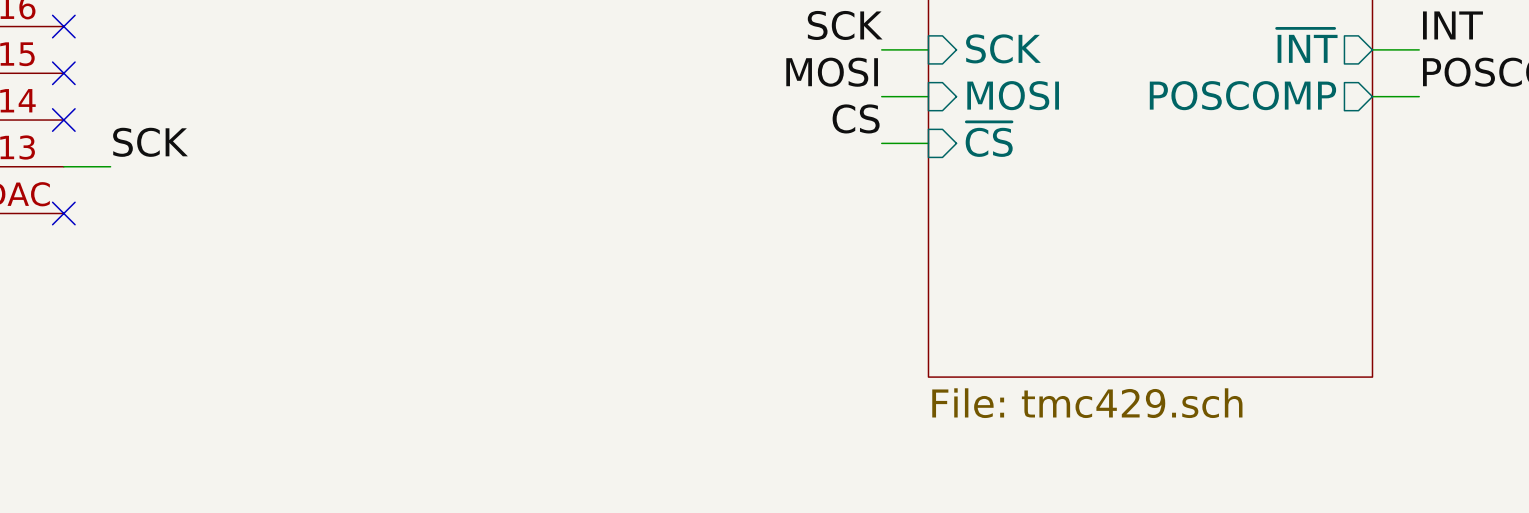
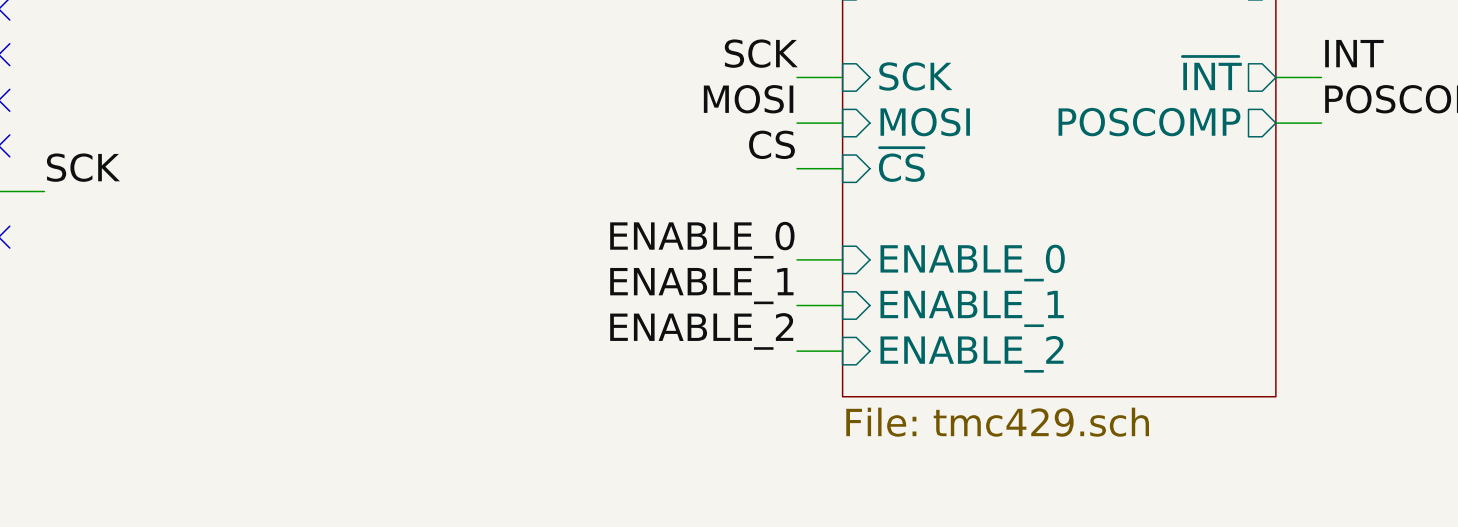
label: none -> ENABLE_0 (702, 240)
wire: none -> (796, 259) (842, 259)
sheet pin: none -> ENABLE_0 (972, 263)
label: none -> ENABLE_1 (701, 286)
wire: none -> (796, 305) (842, 305)
sheet pin: none -> ENABLE_1 (972, 308)
label: none -> ENABLE_2 (701, 331)
wire: none -> (796, 351) (842, 351)
sheet pin: none -> ENABLE_2 (972, 354)

